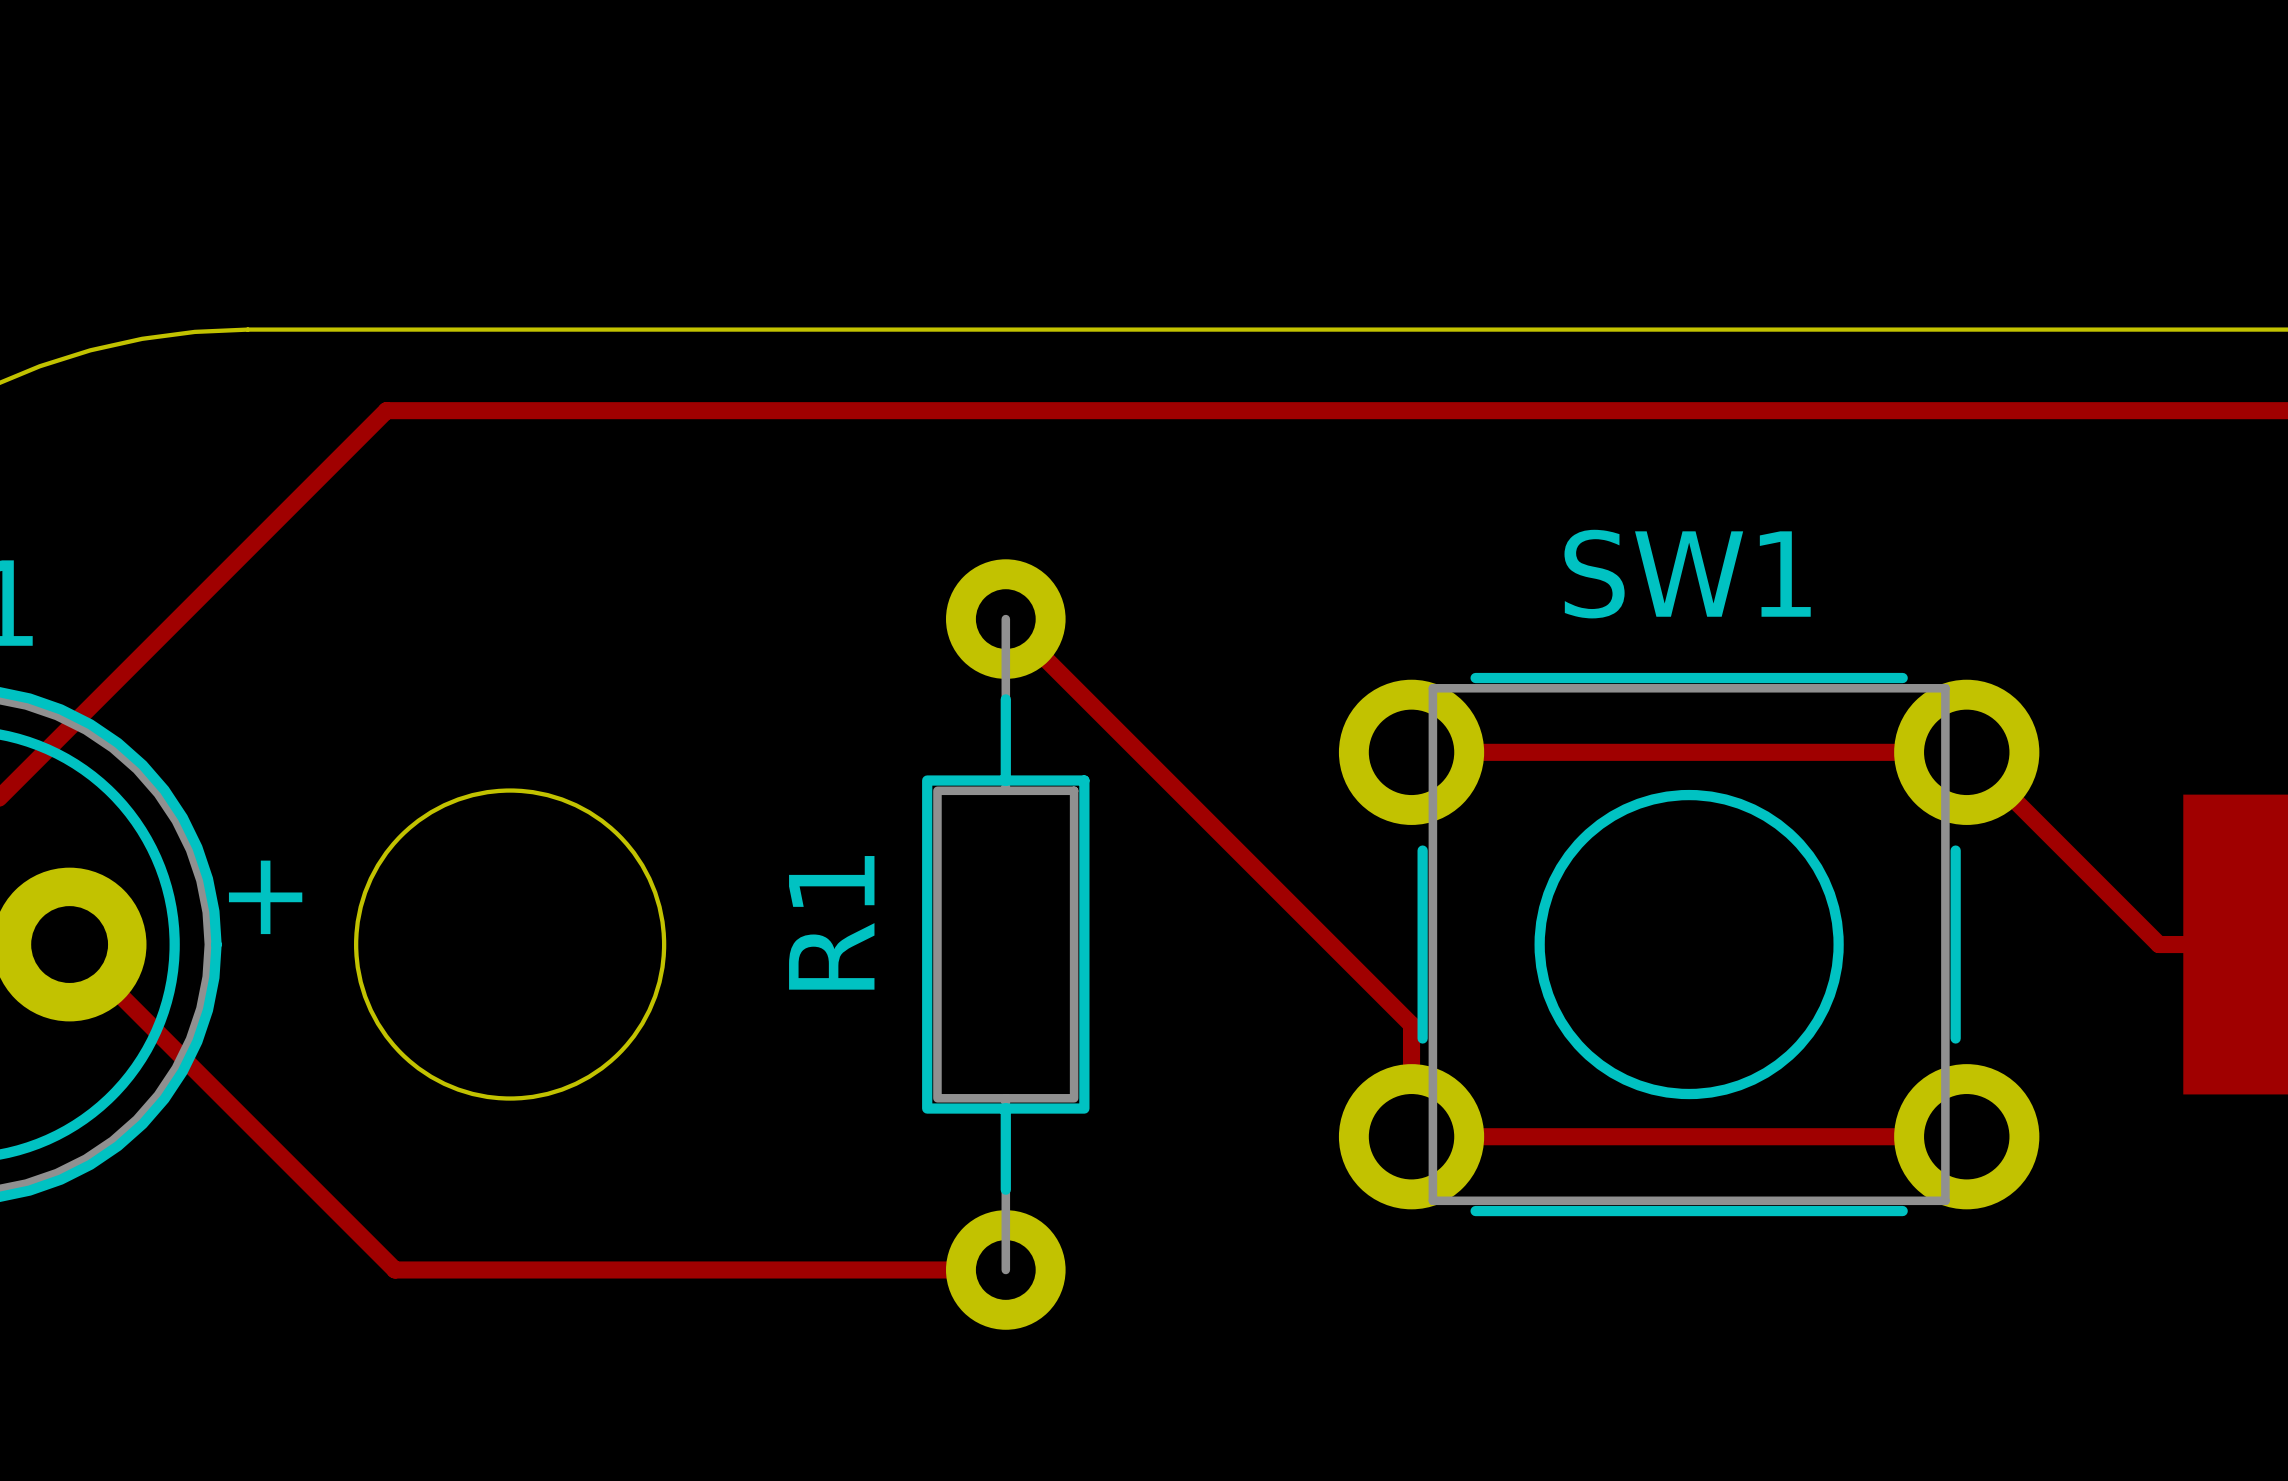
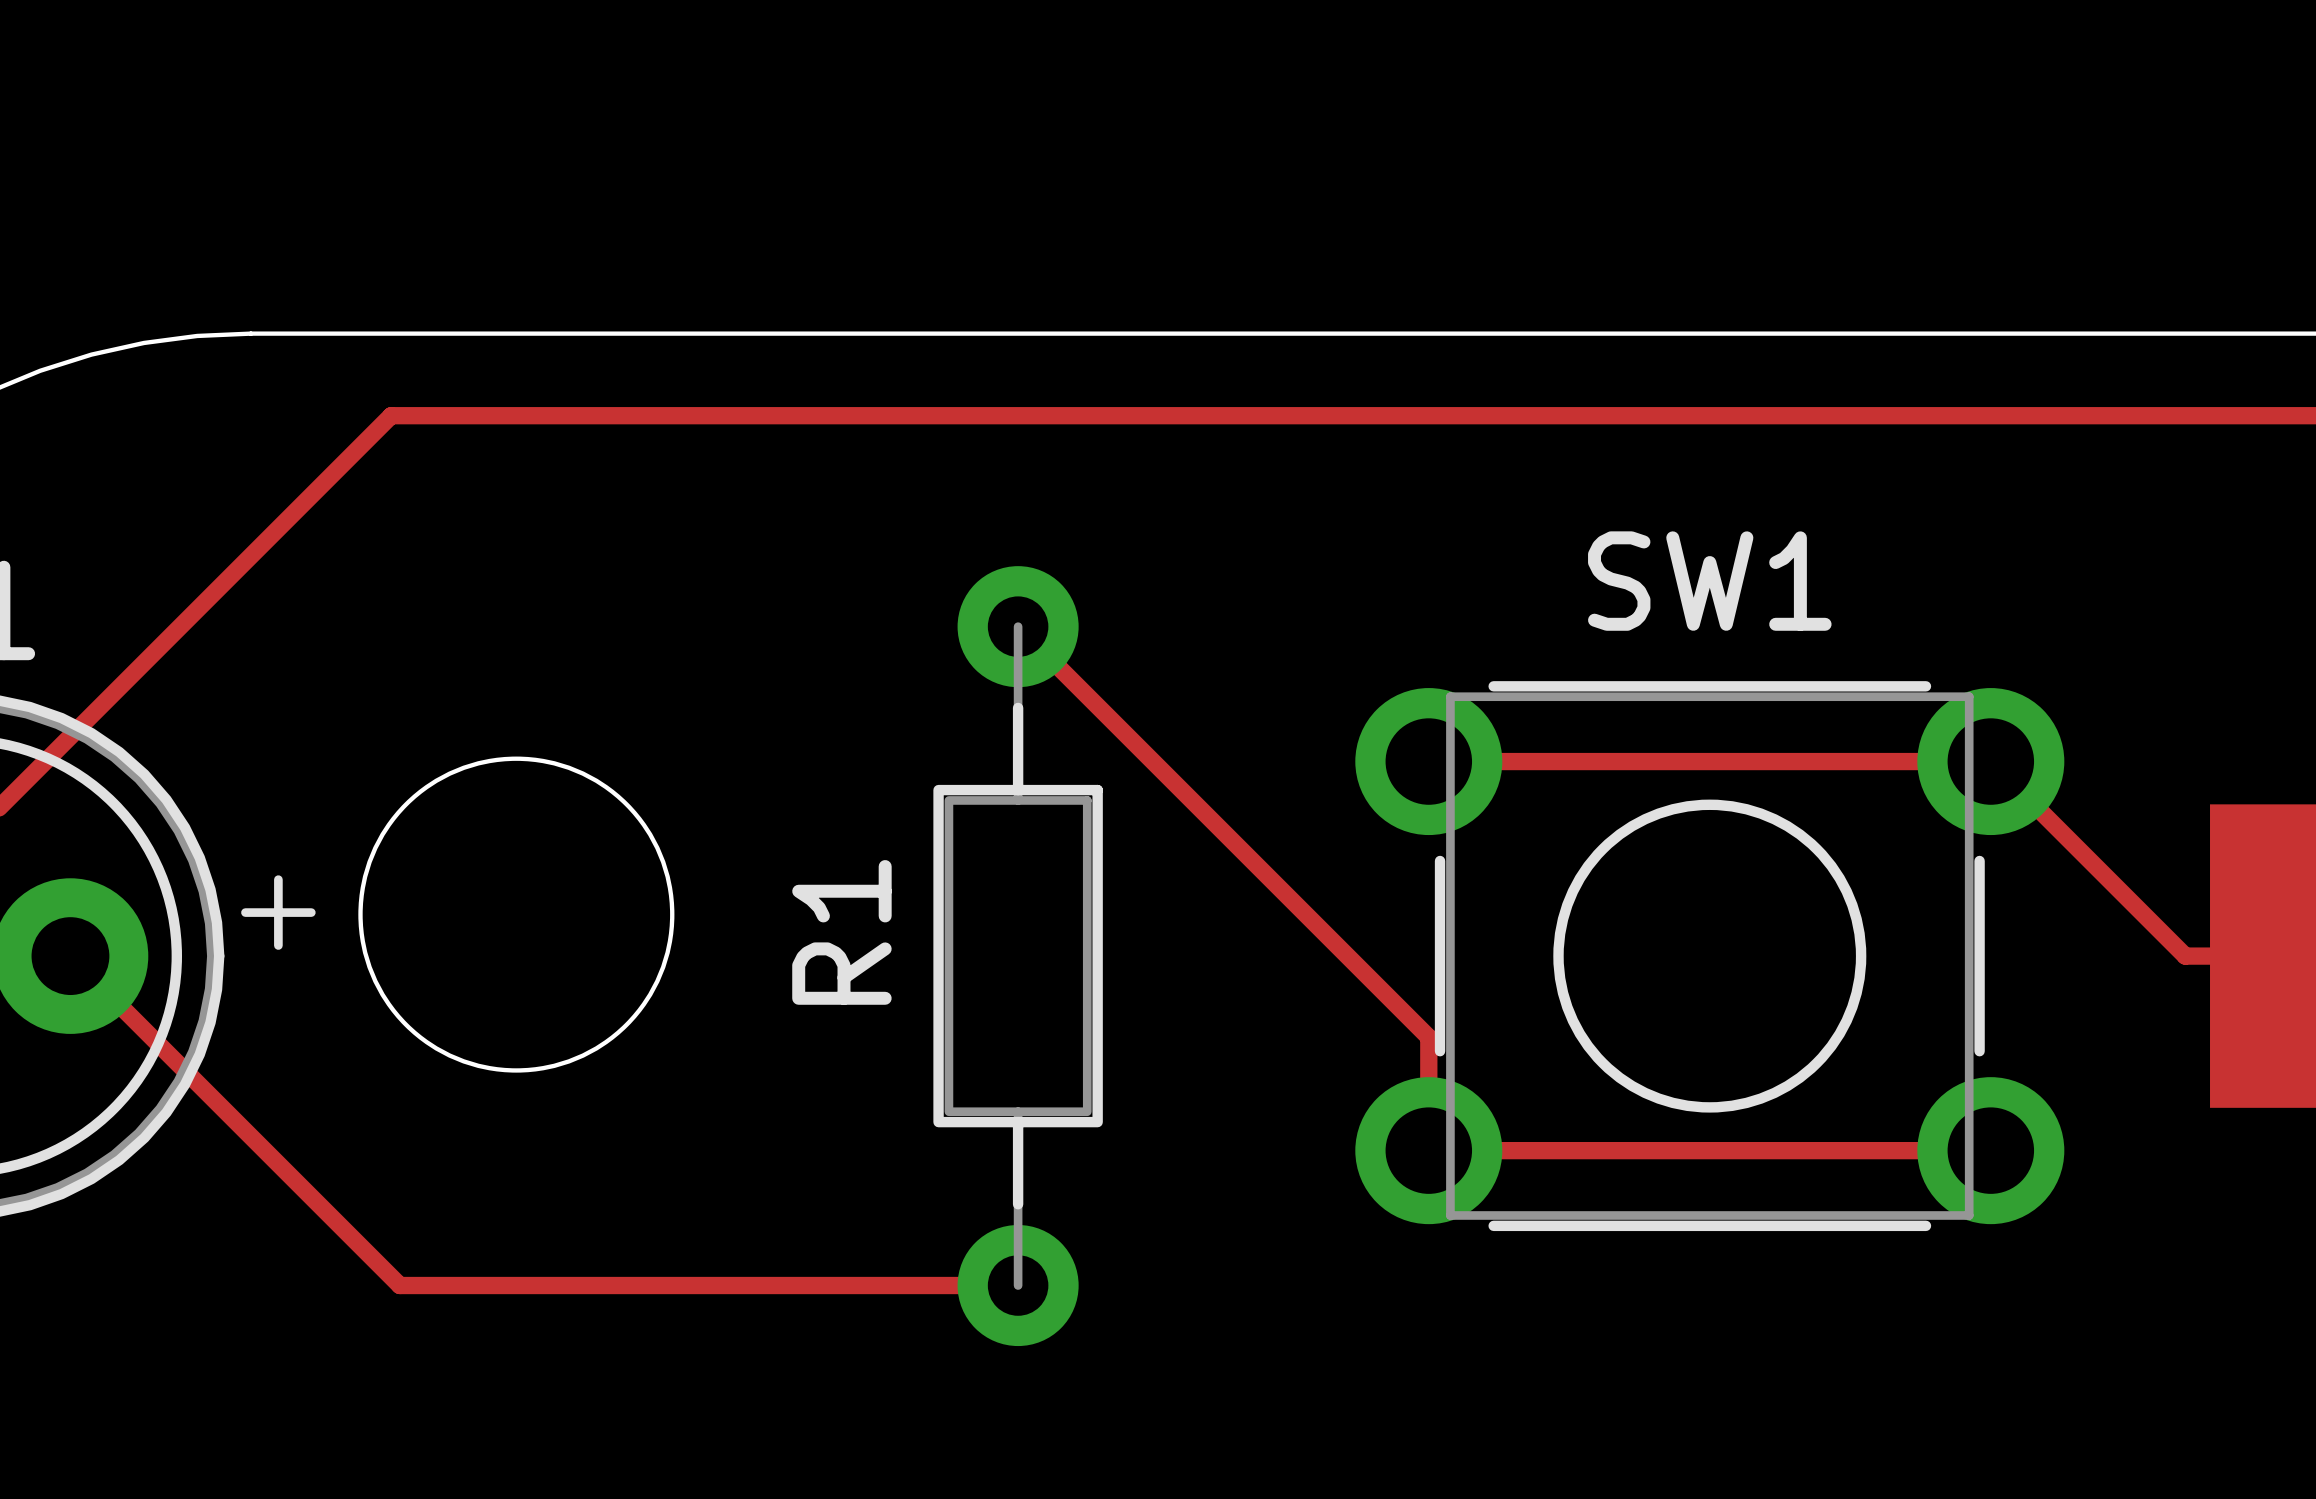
round board edge position: (510, 944) -> (516, 914)

